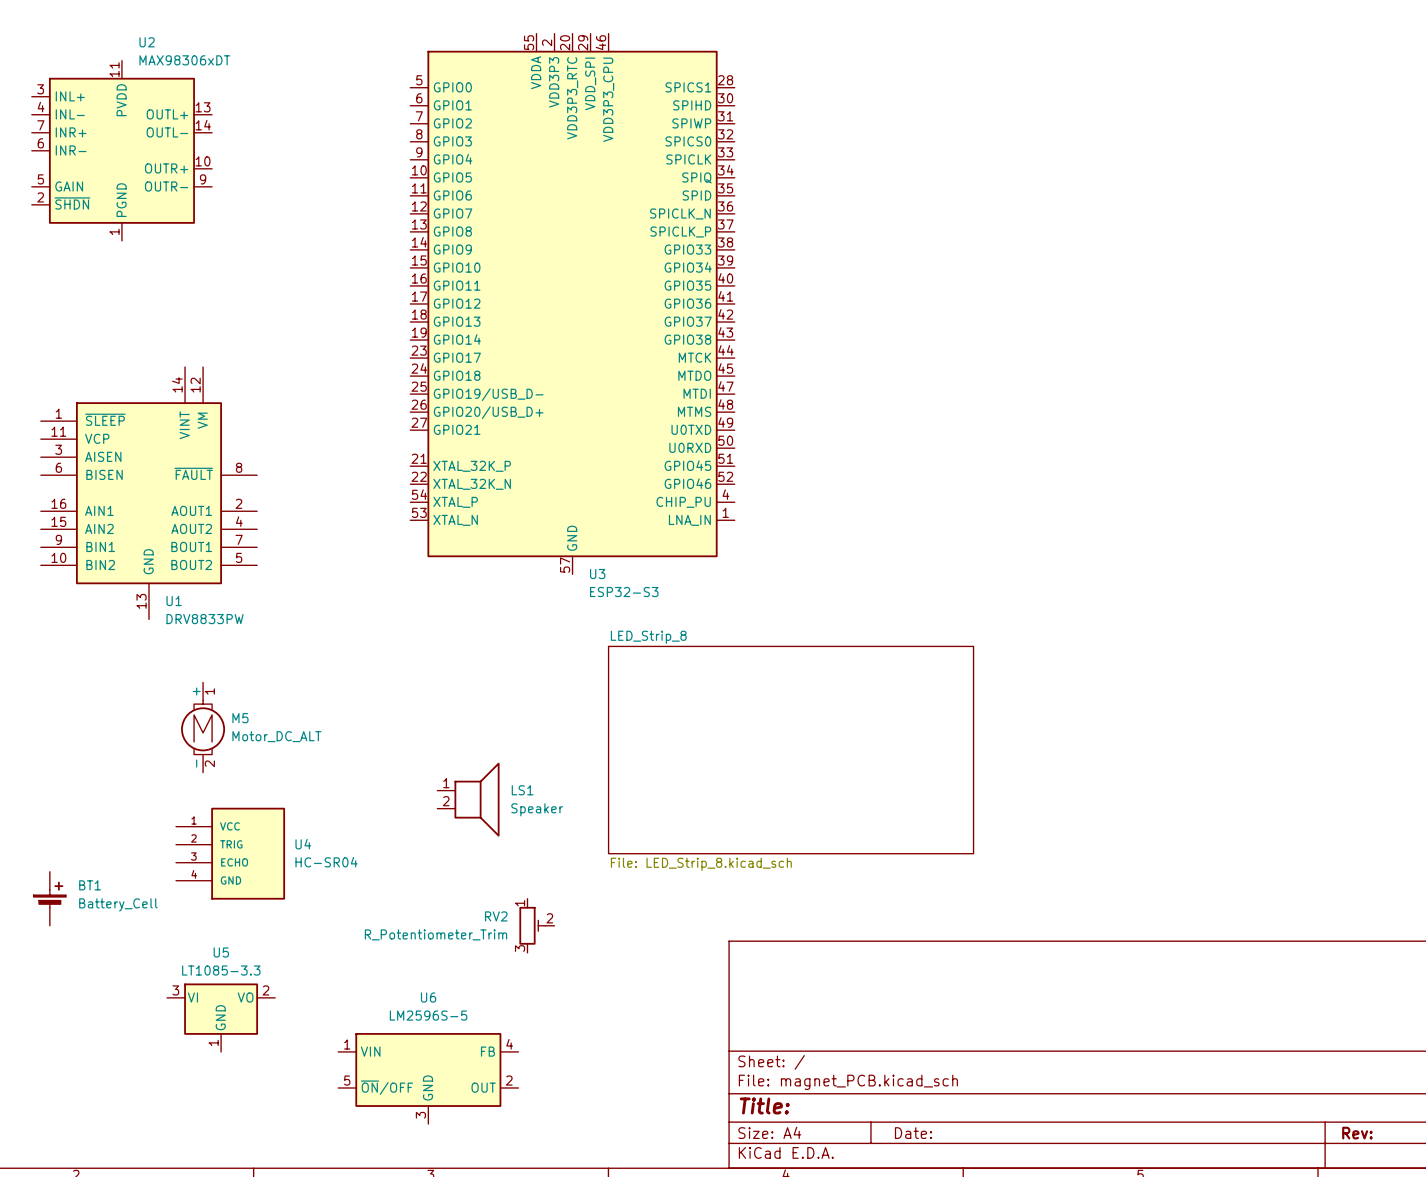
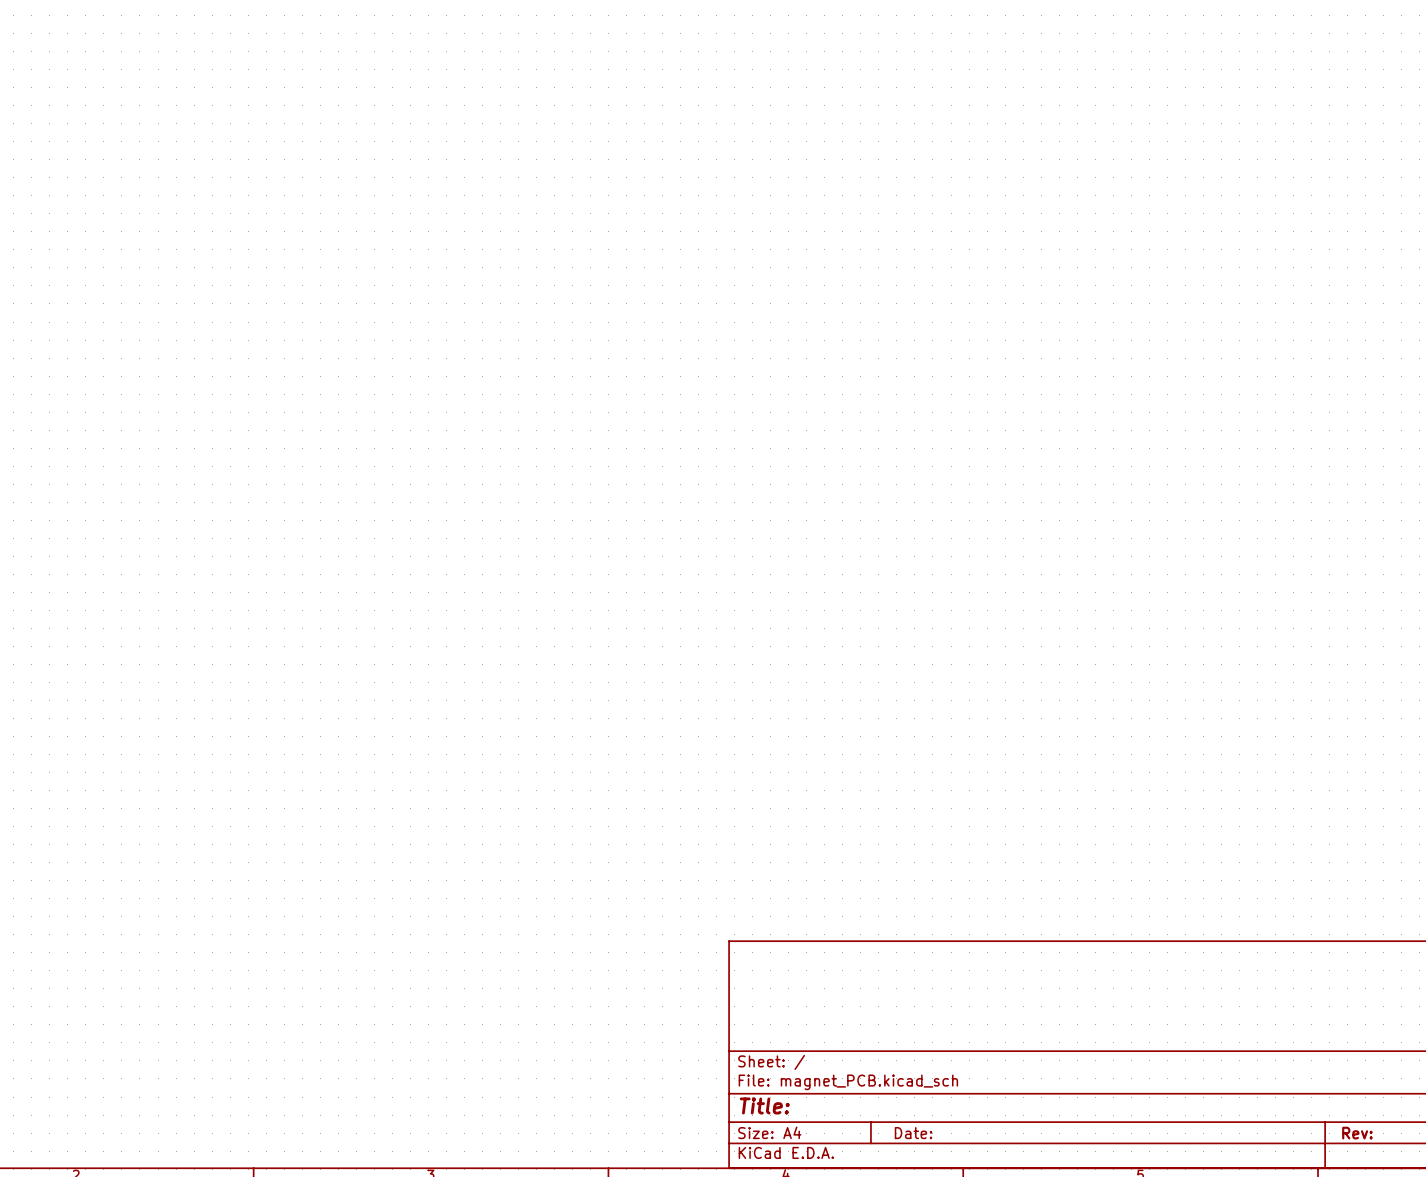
U2: MAX98306xDT (121, 150) -> none
U3: ESP32-S3 (572, 303) -> none
U1: DRV8833PW (148, 493) -> none
M5: Motor_DC_ALT (203, 727) -> none
sheet LED_Strip_8: File: LED_Strip_8.kicad_sch (791, 750) -> none
LS1: Speaker (468, 799) -> none
U4: HC-SR04 (230, 853) -> none
BT1: Battery_Cell (49, 898) -> none
RV2: R_Potentiometer_Trim (536, 925) -> none
U5: LT1085-3.3 (221, 1017) -> none
U6: LM2596S-5 (428, 1078) -> none

